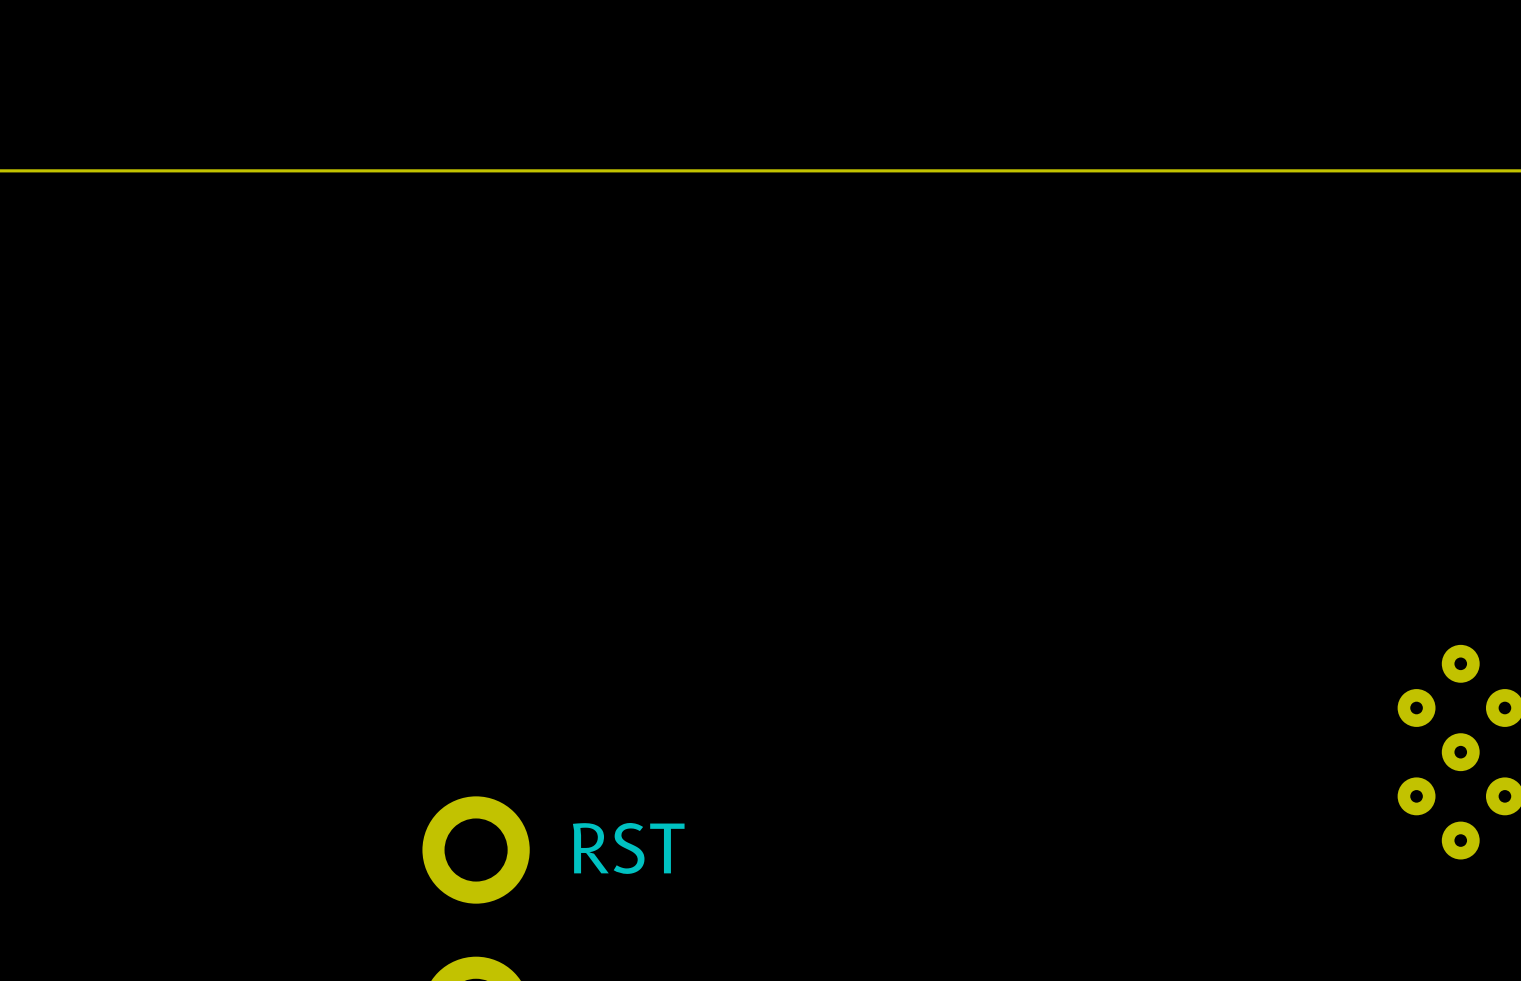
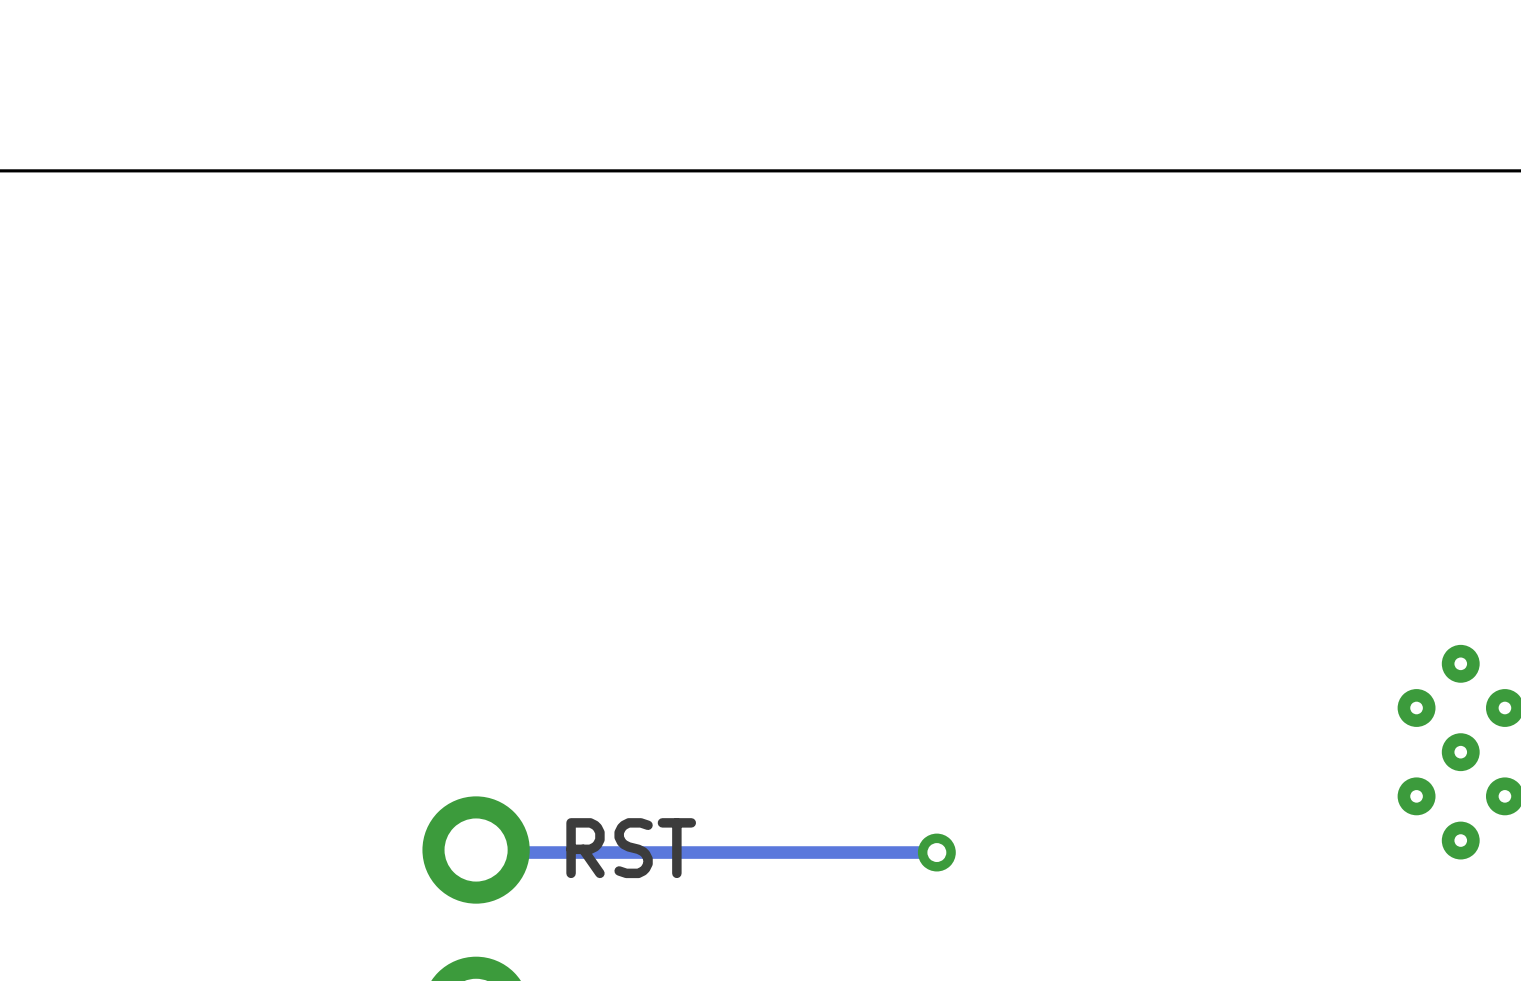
track: none -> (936, 852) (476, 852)
via: none -> (936, 852)

